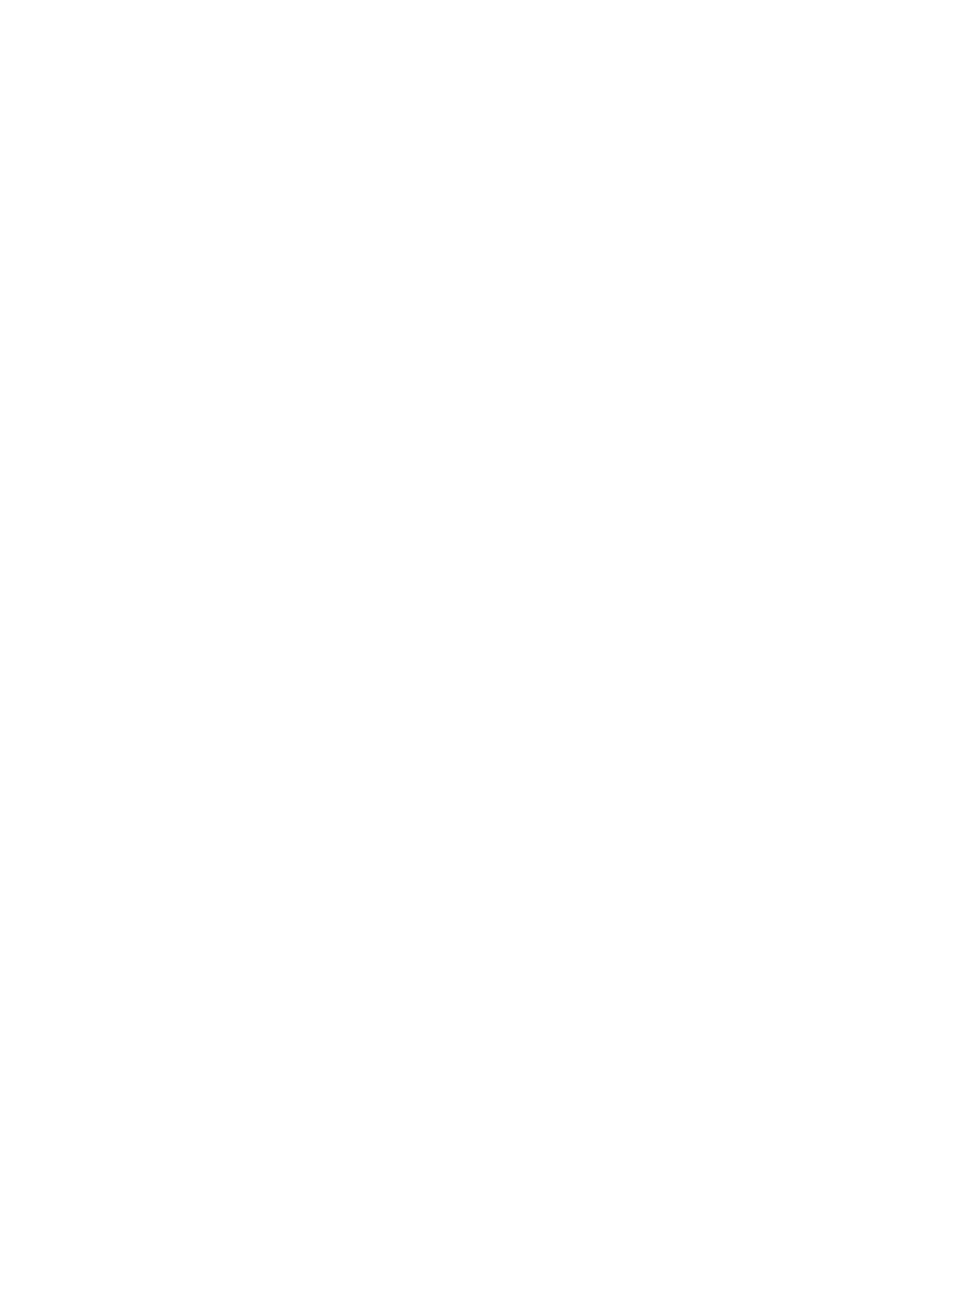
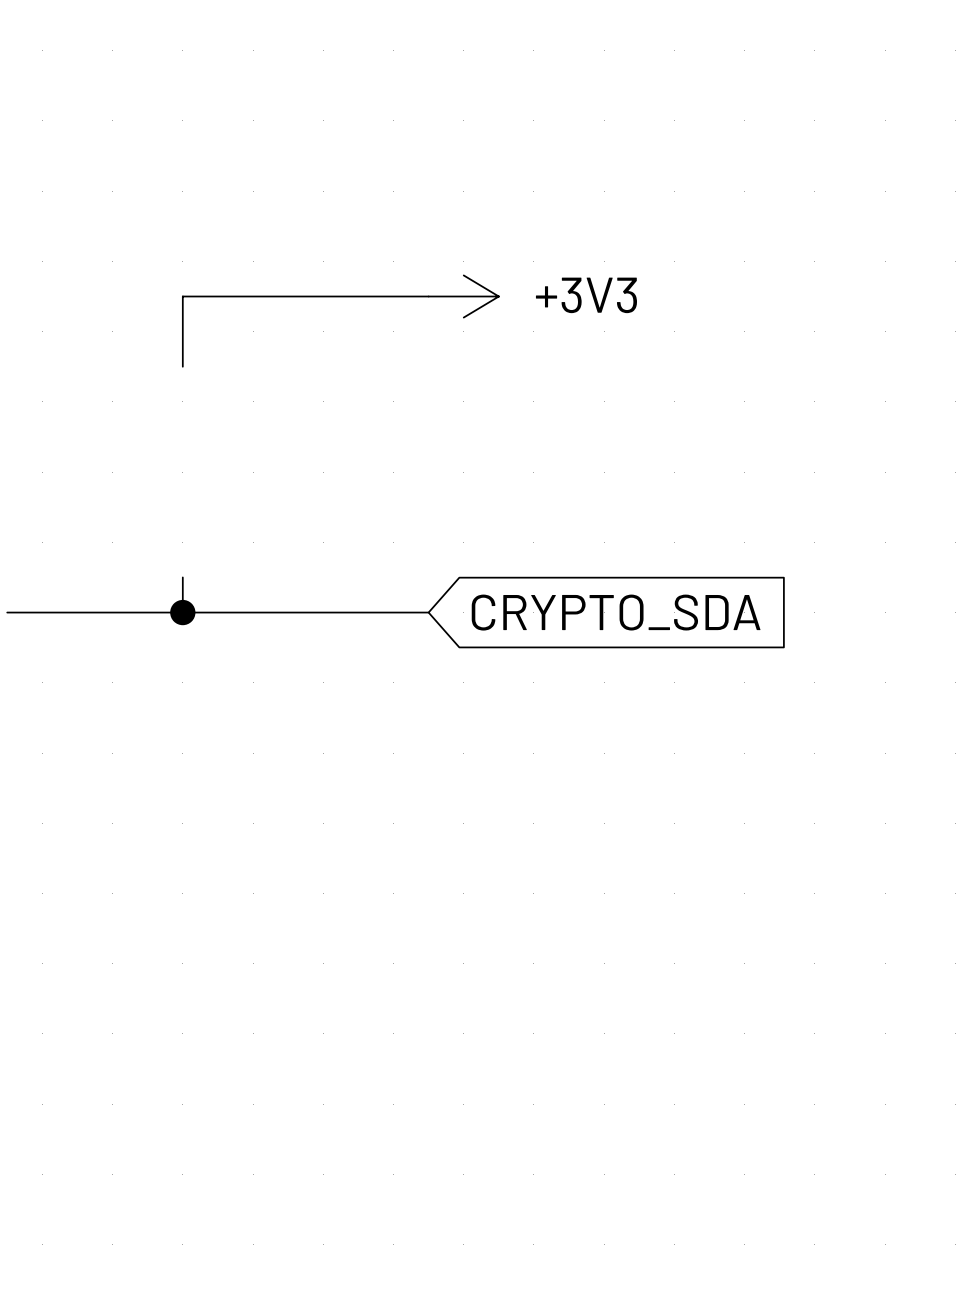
wire: none -> (428, 296) (182, 296) (182, 366)
power symbol: none -> +3V3 (463, 296)
wire: none -> (182, 577) (182, 612)
wire: none -> (7, 612) (428, 612)
junction: none -> (182, 612)
global label: none -> CRYPTO_SDA (616, 612)

